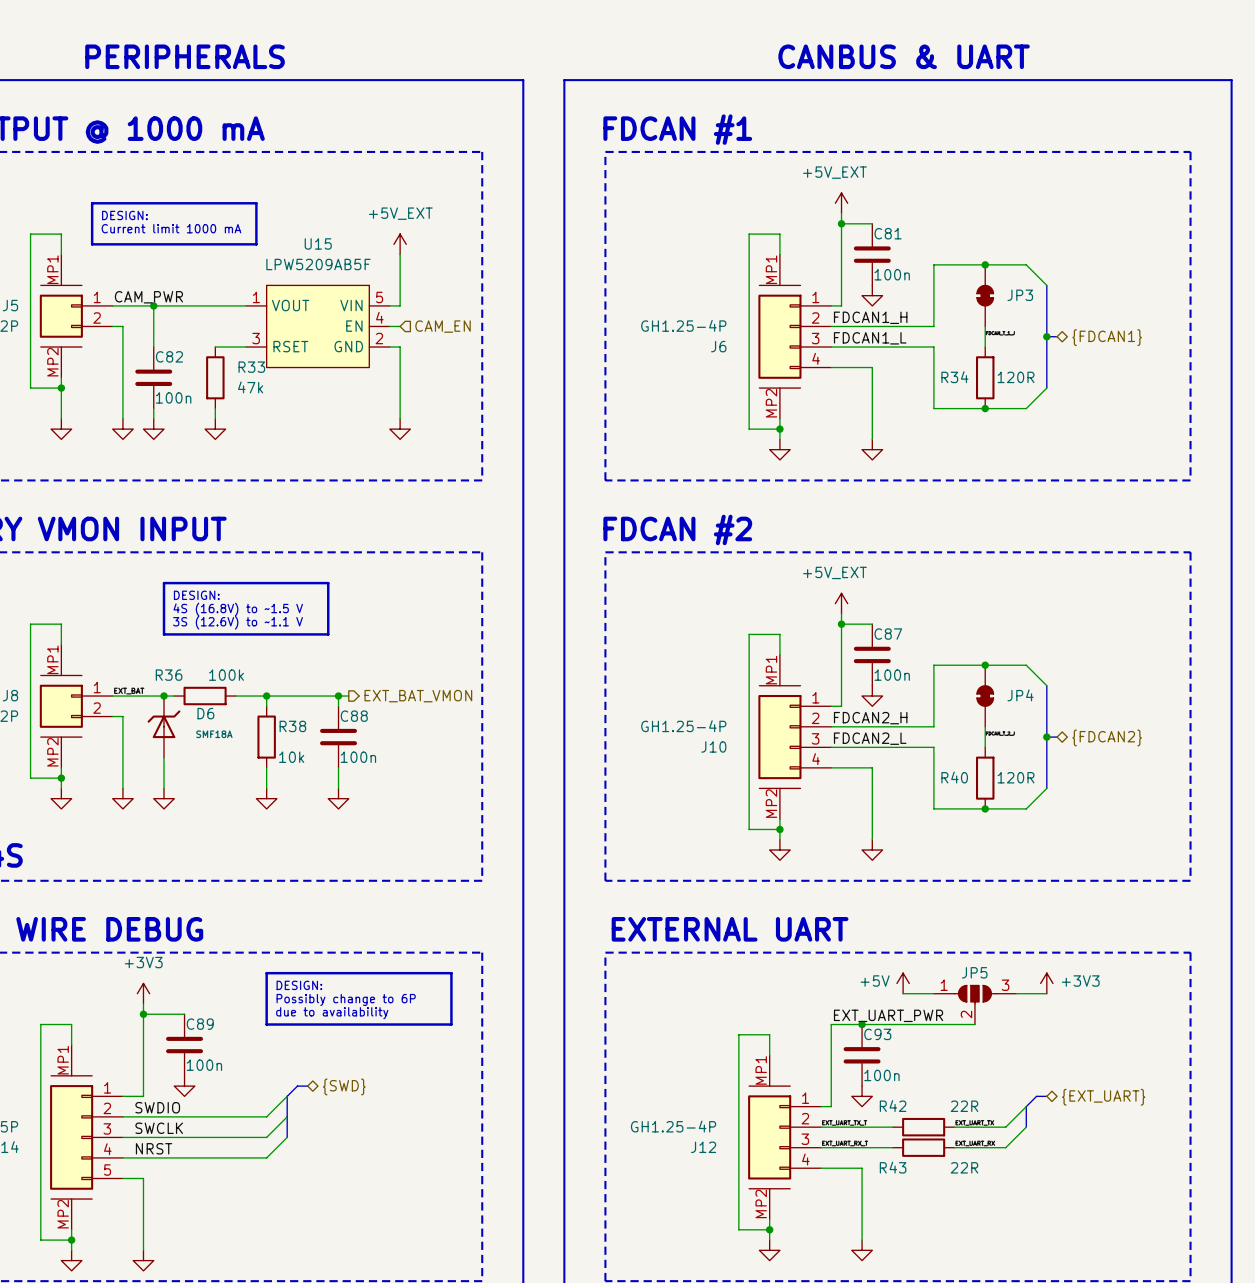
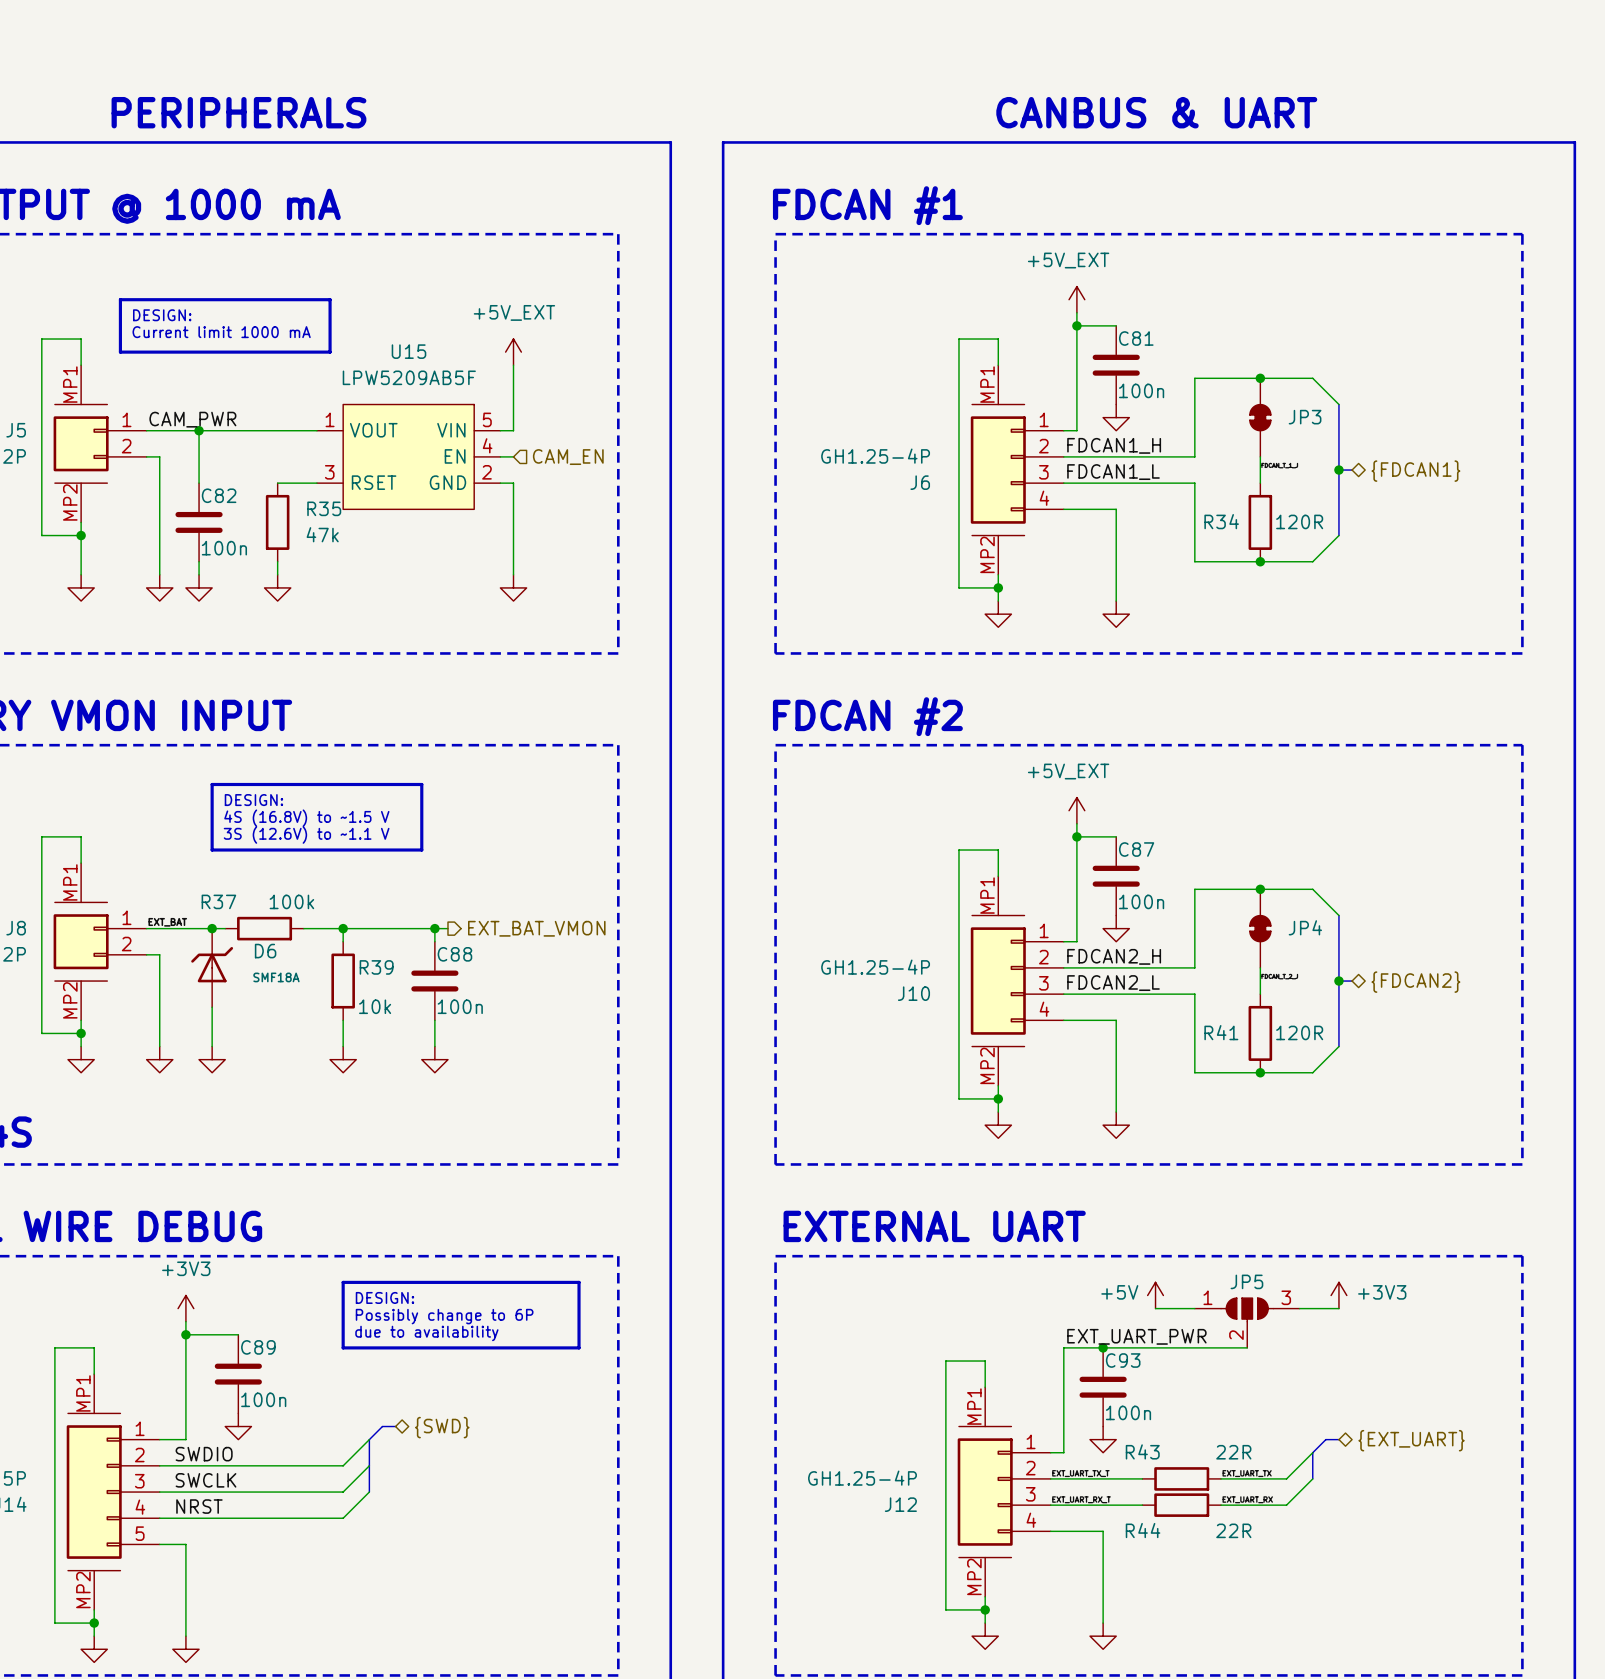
R33 name: R33 (251, 367) -> R35 (324, 508)
R36 name: R36 (169, 675) -> R37 (218, 901)
R38 name: R38 (292, 726) -> R39 (376, 967)
R40 name: R40 (954, 777) -> R41 (1221, 1032)
R42 name: R42 (893, 1106) -> R43 (1142, 1451)
R43 name: R43 (893, 1167) -> R44 (1143, 1530)

